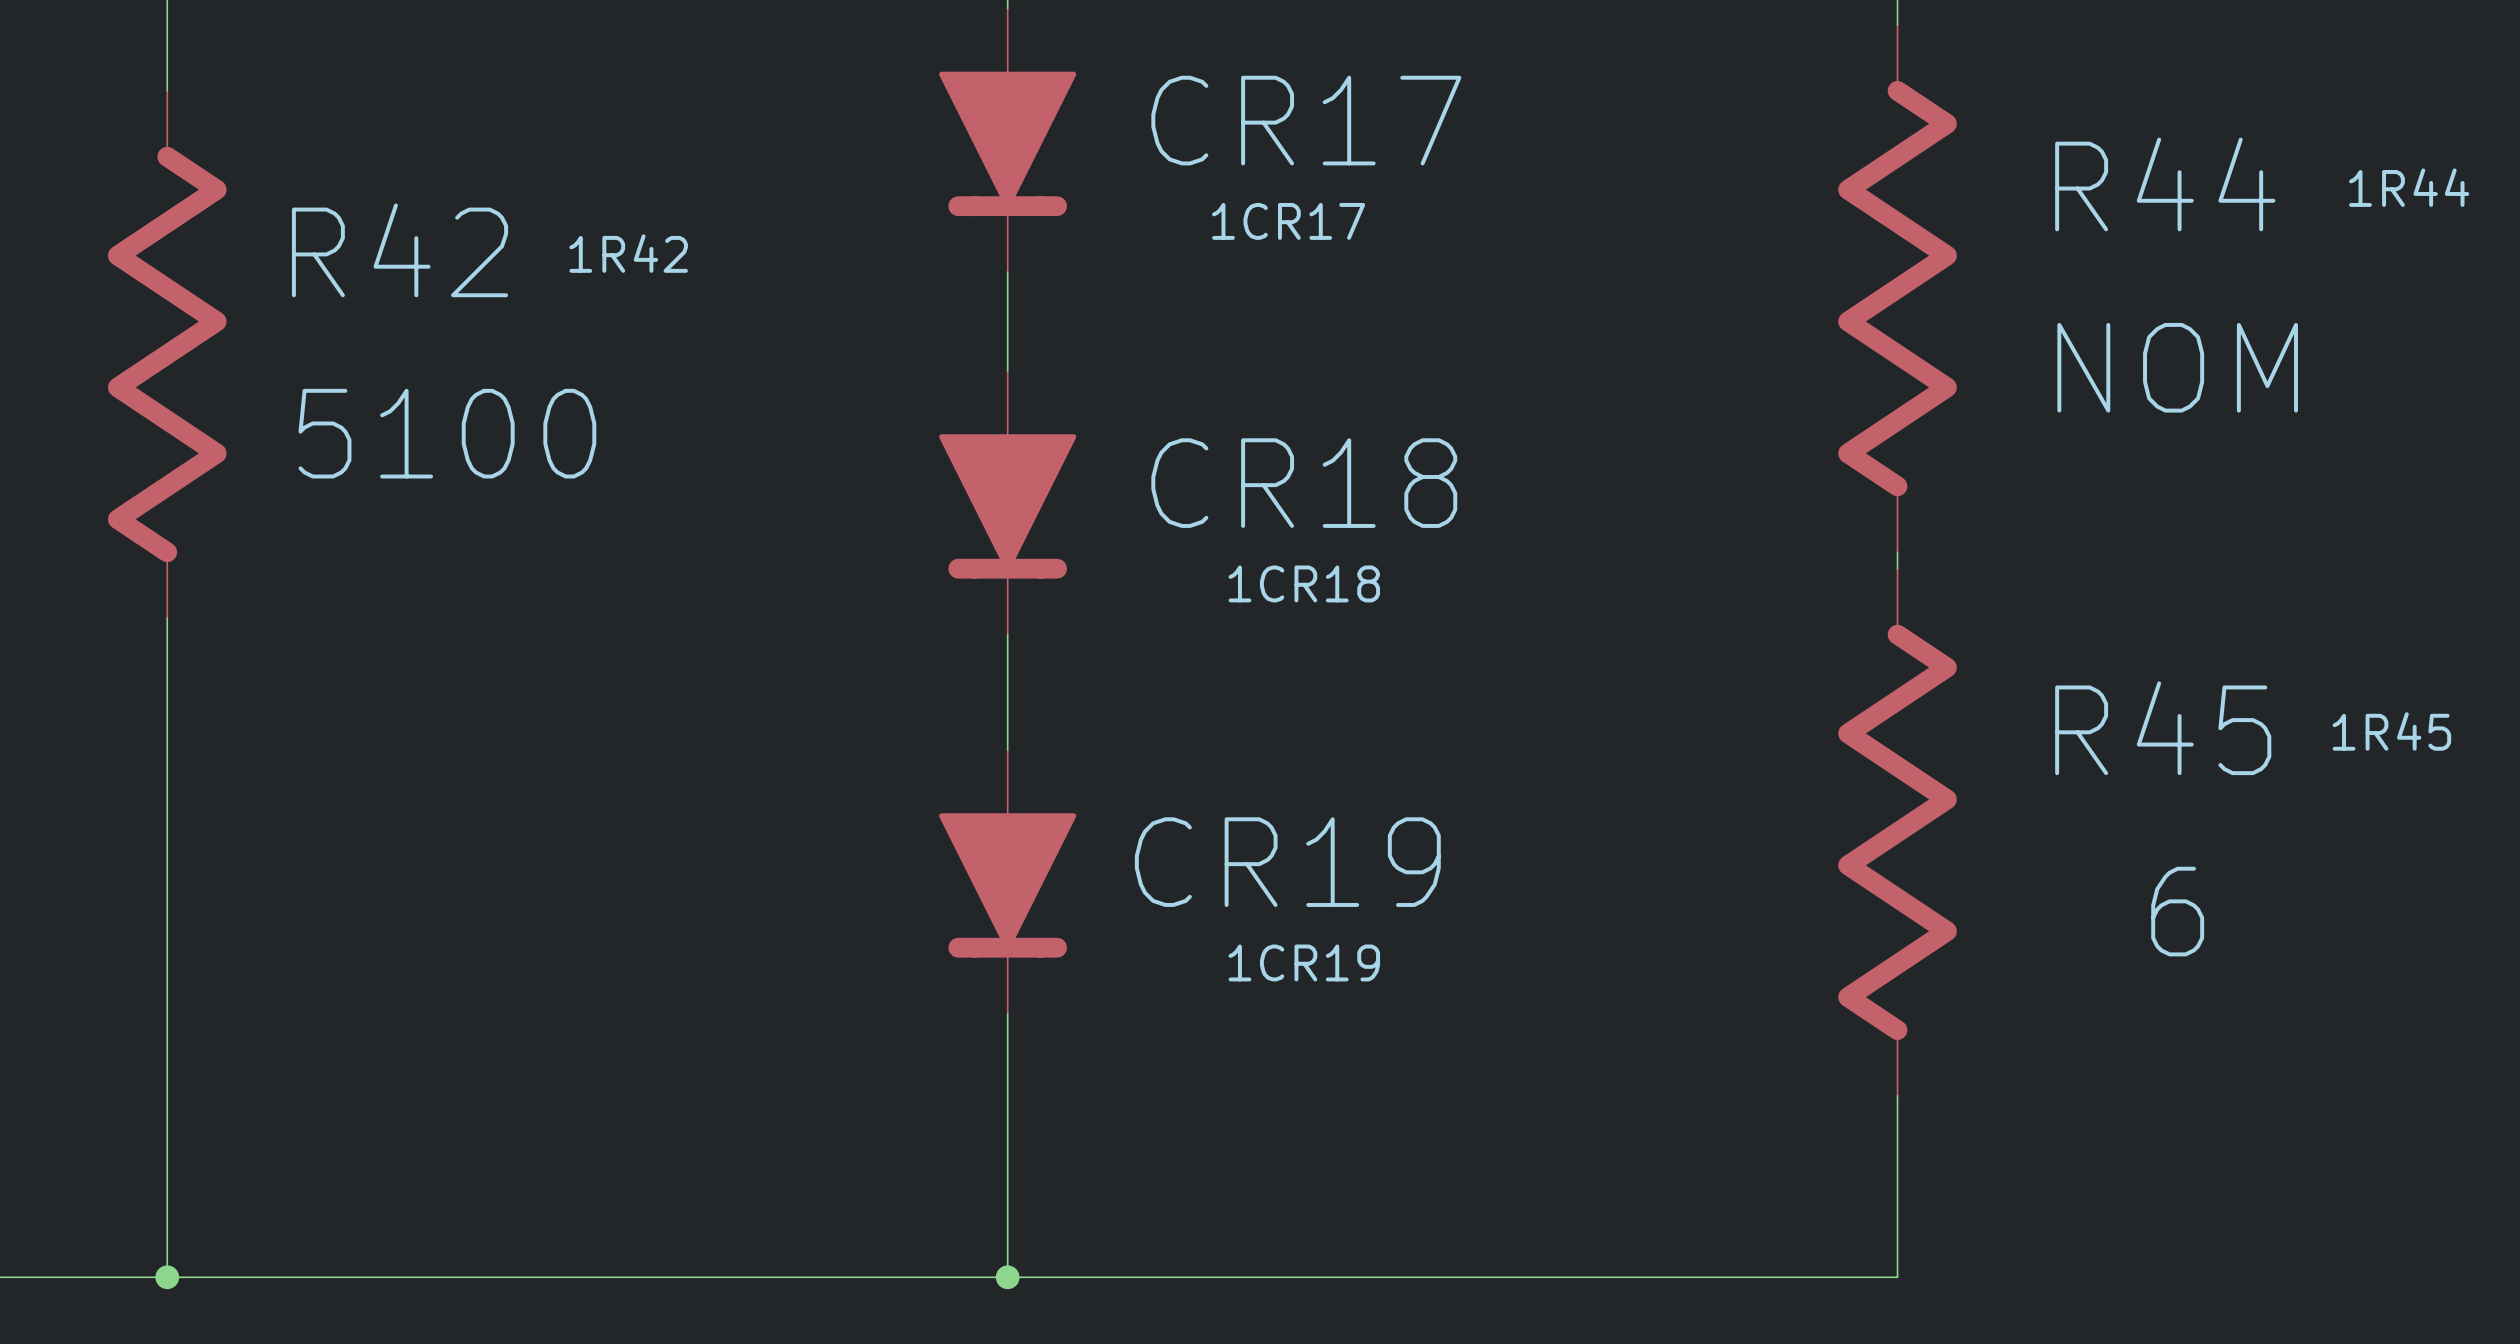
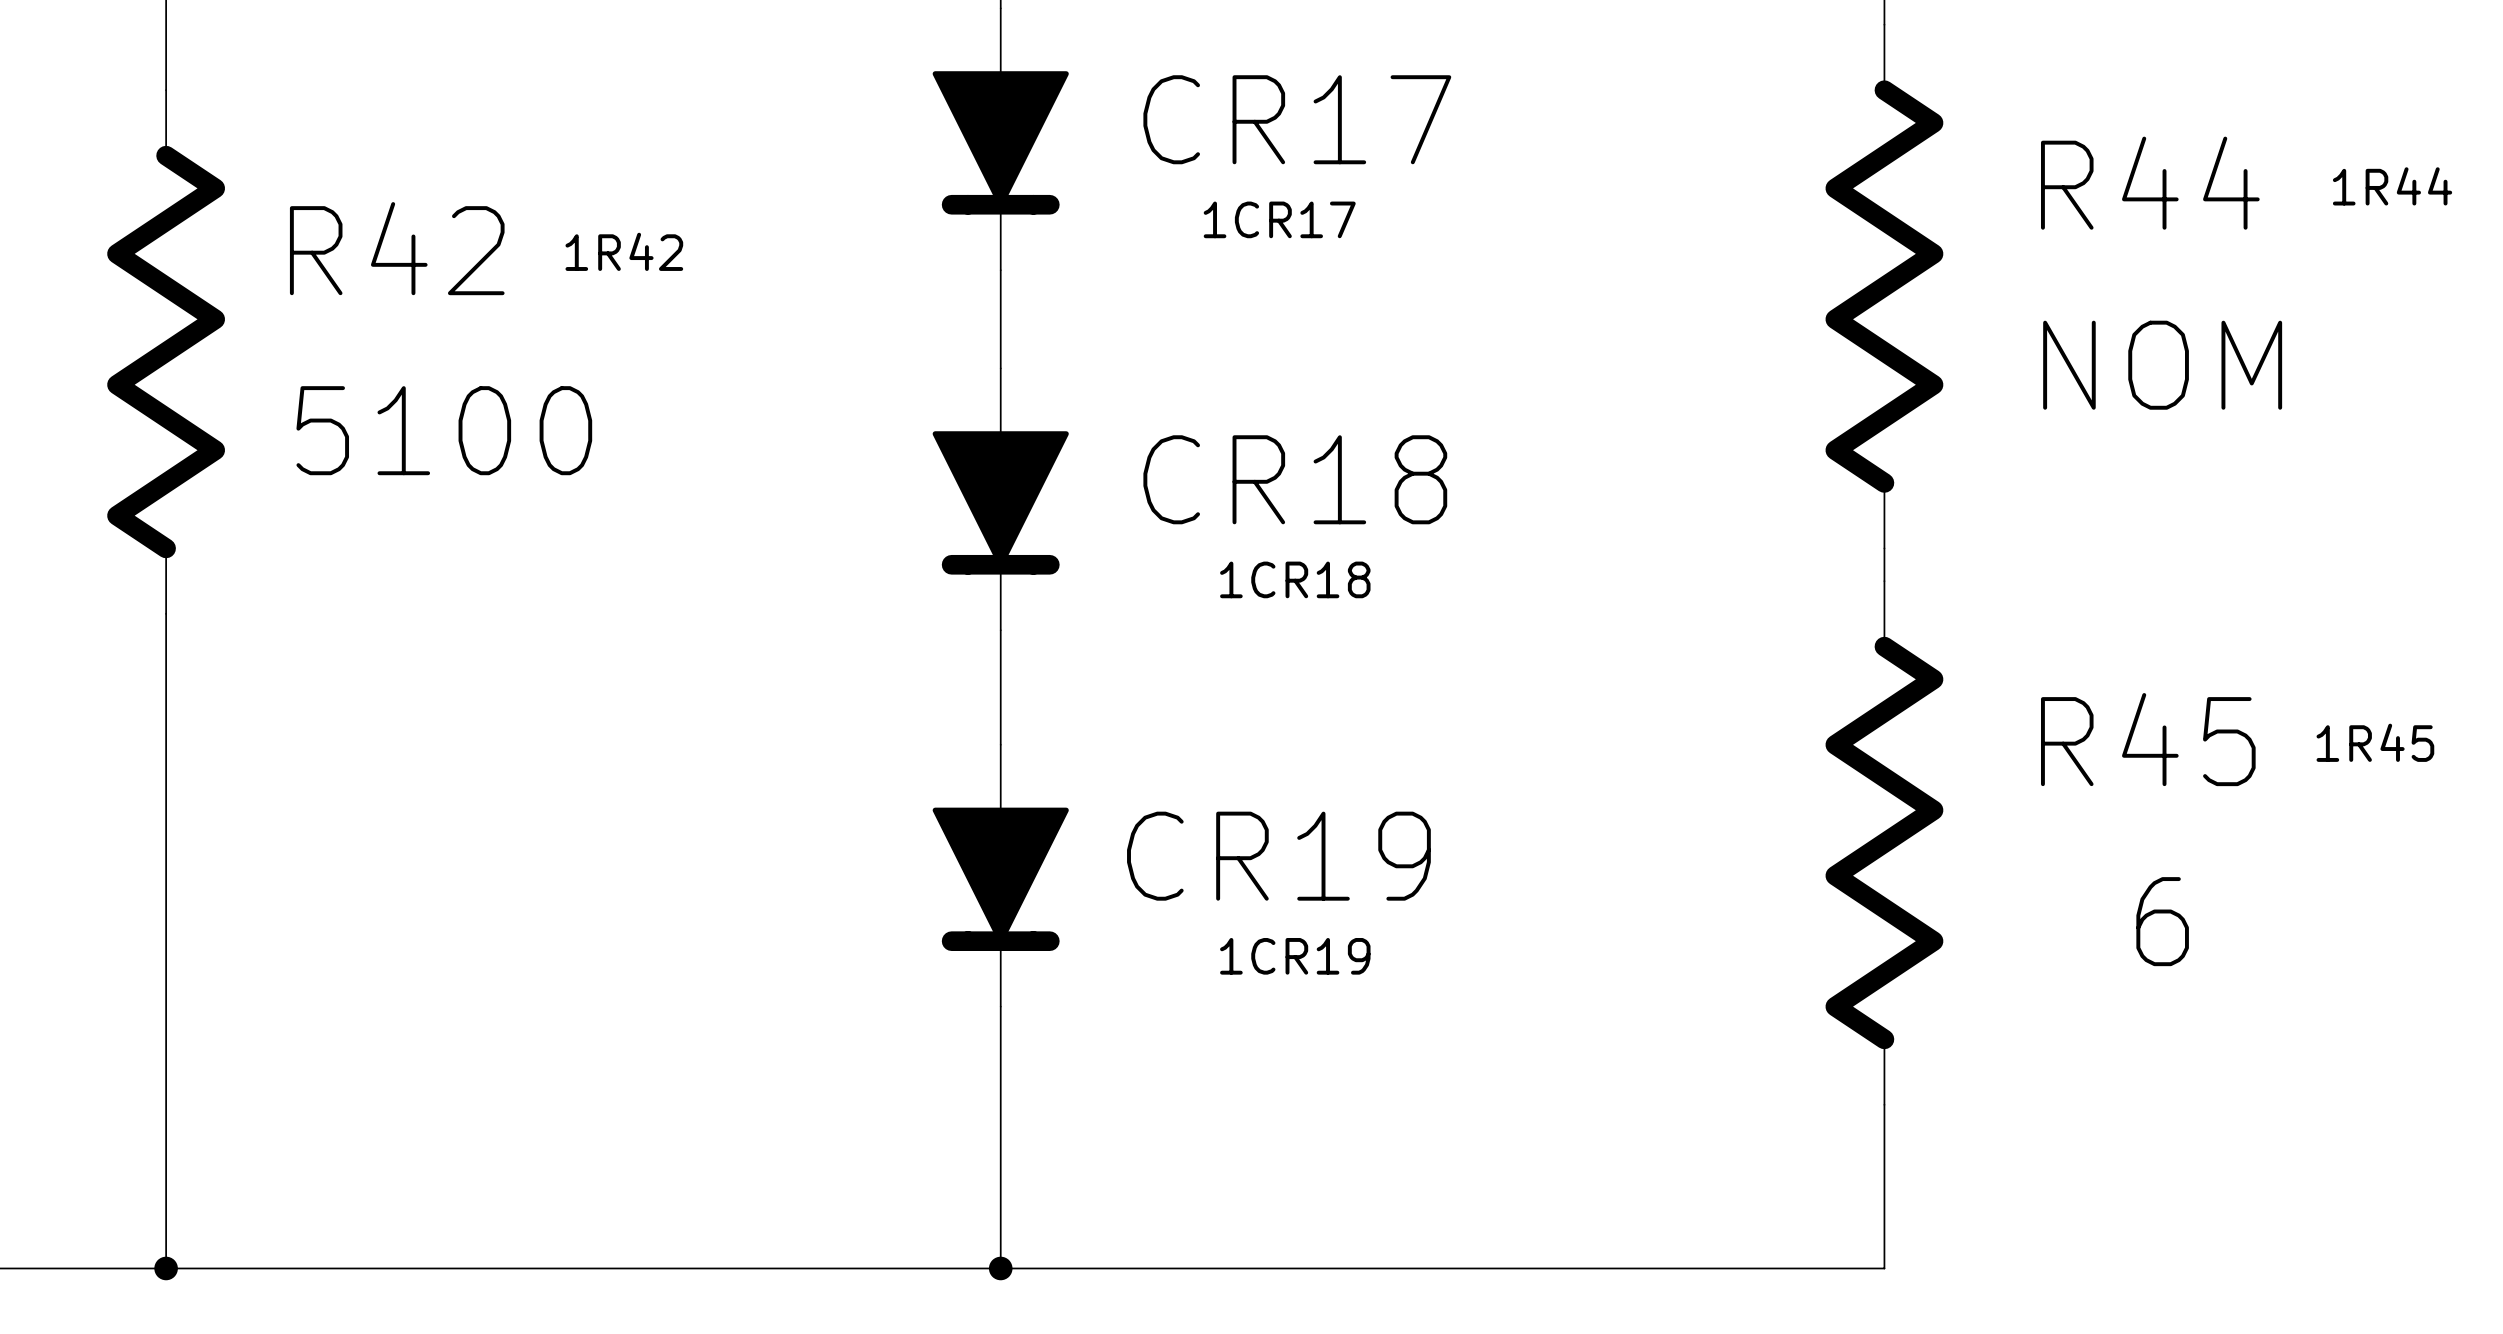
1R45 position: (1897, 832) -> (1884, 842)

